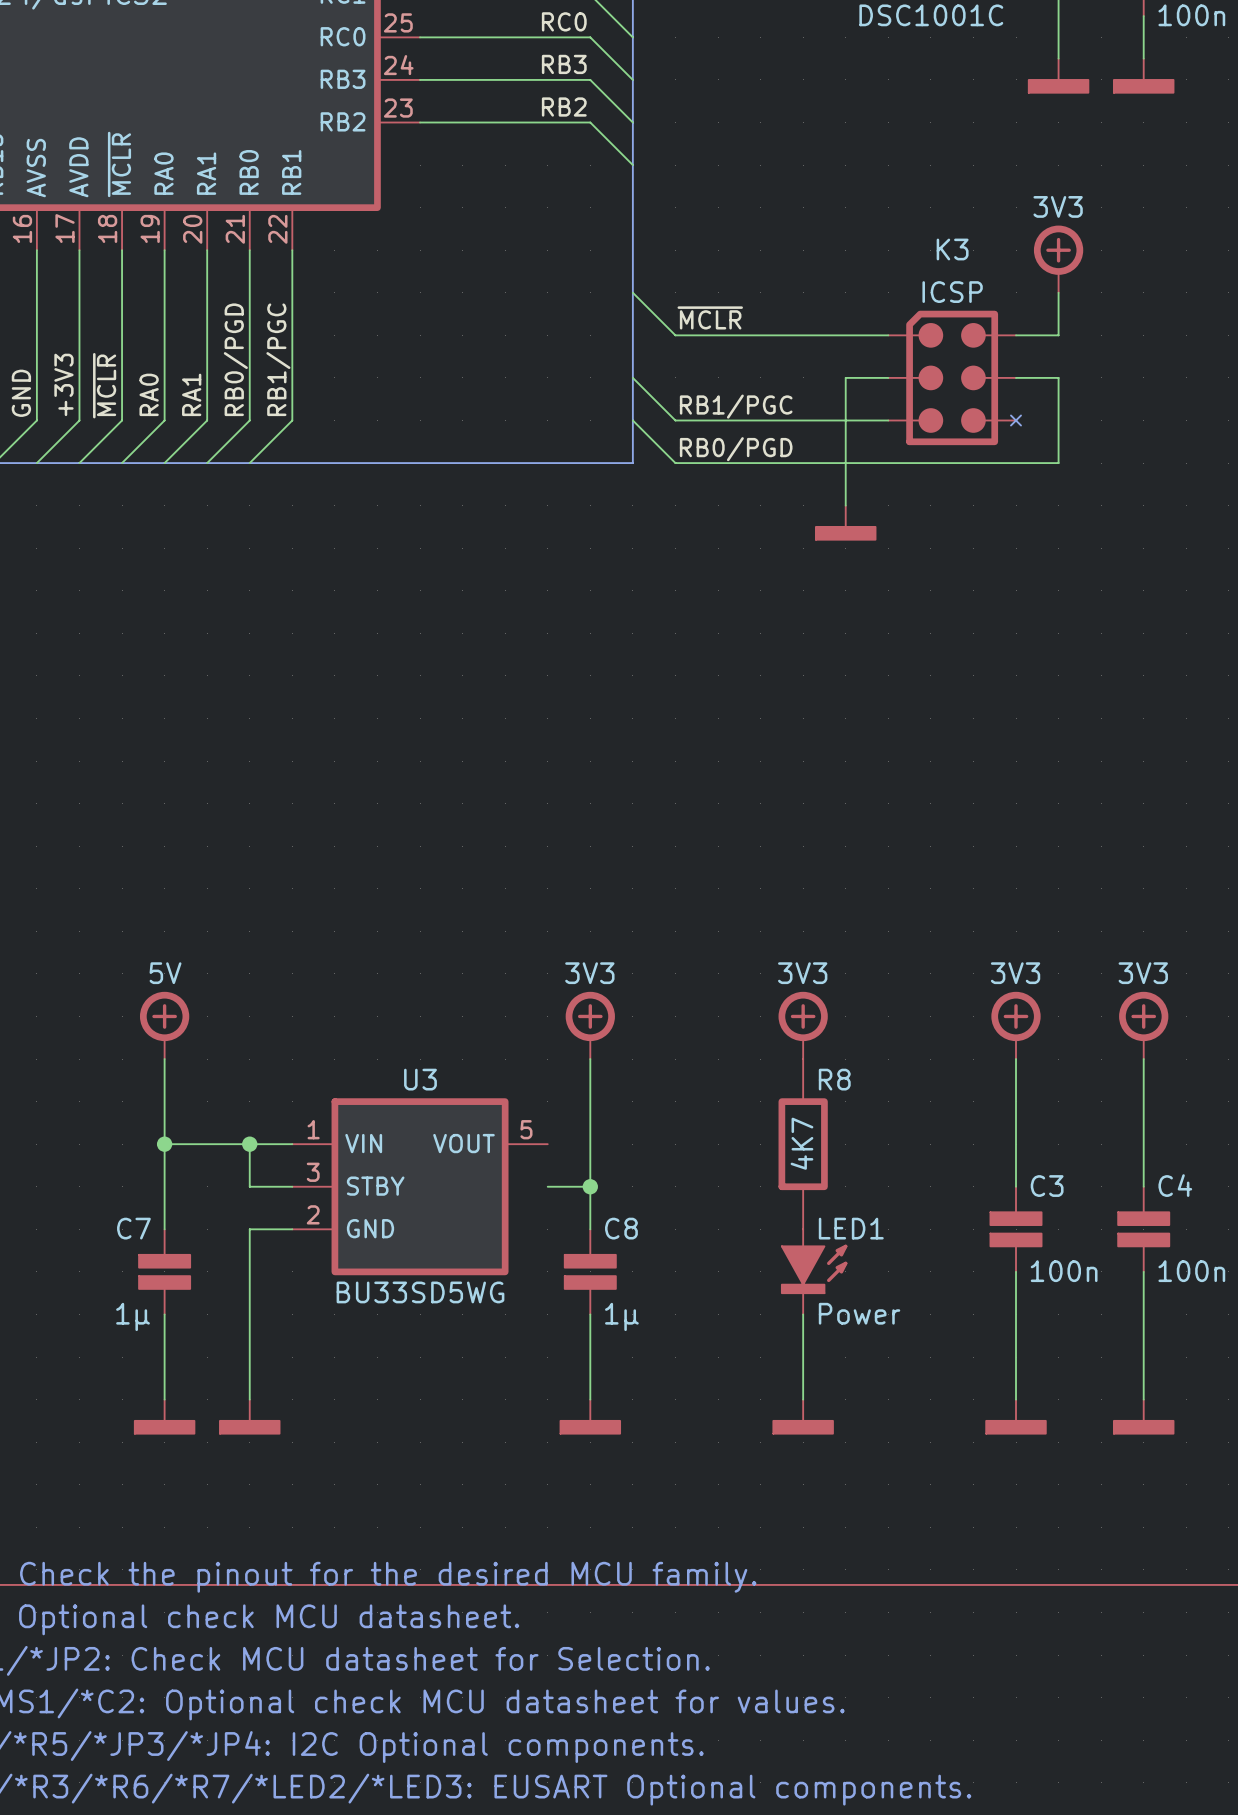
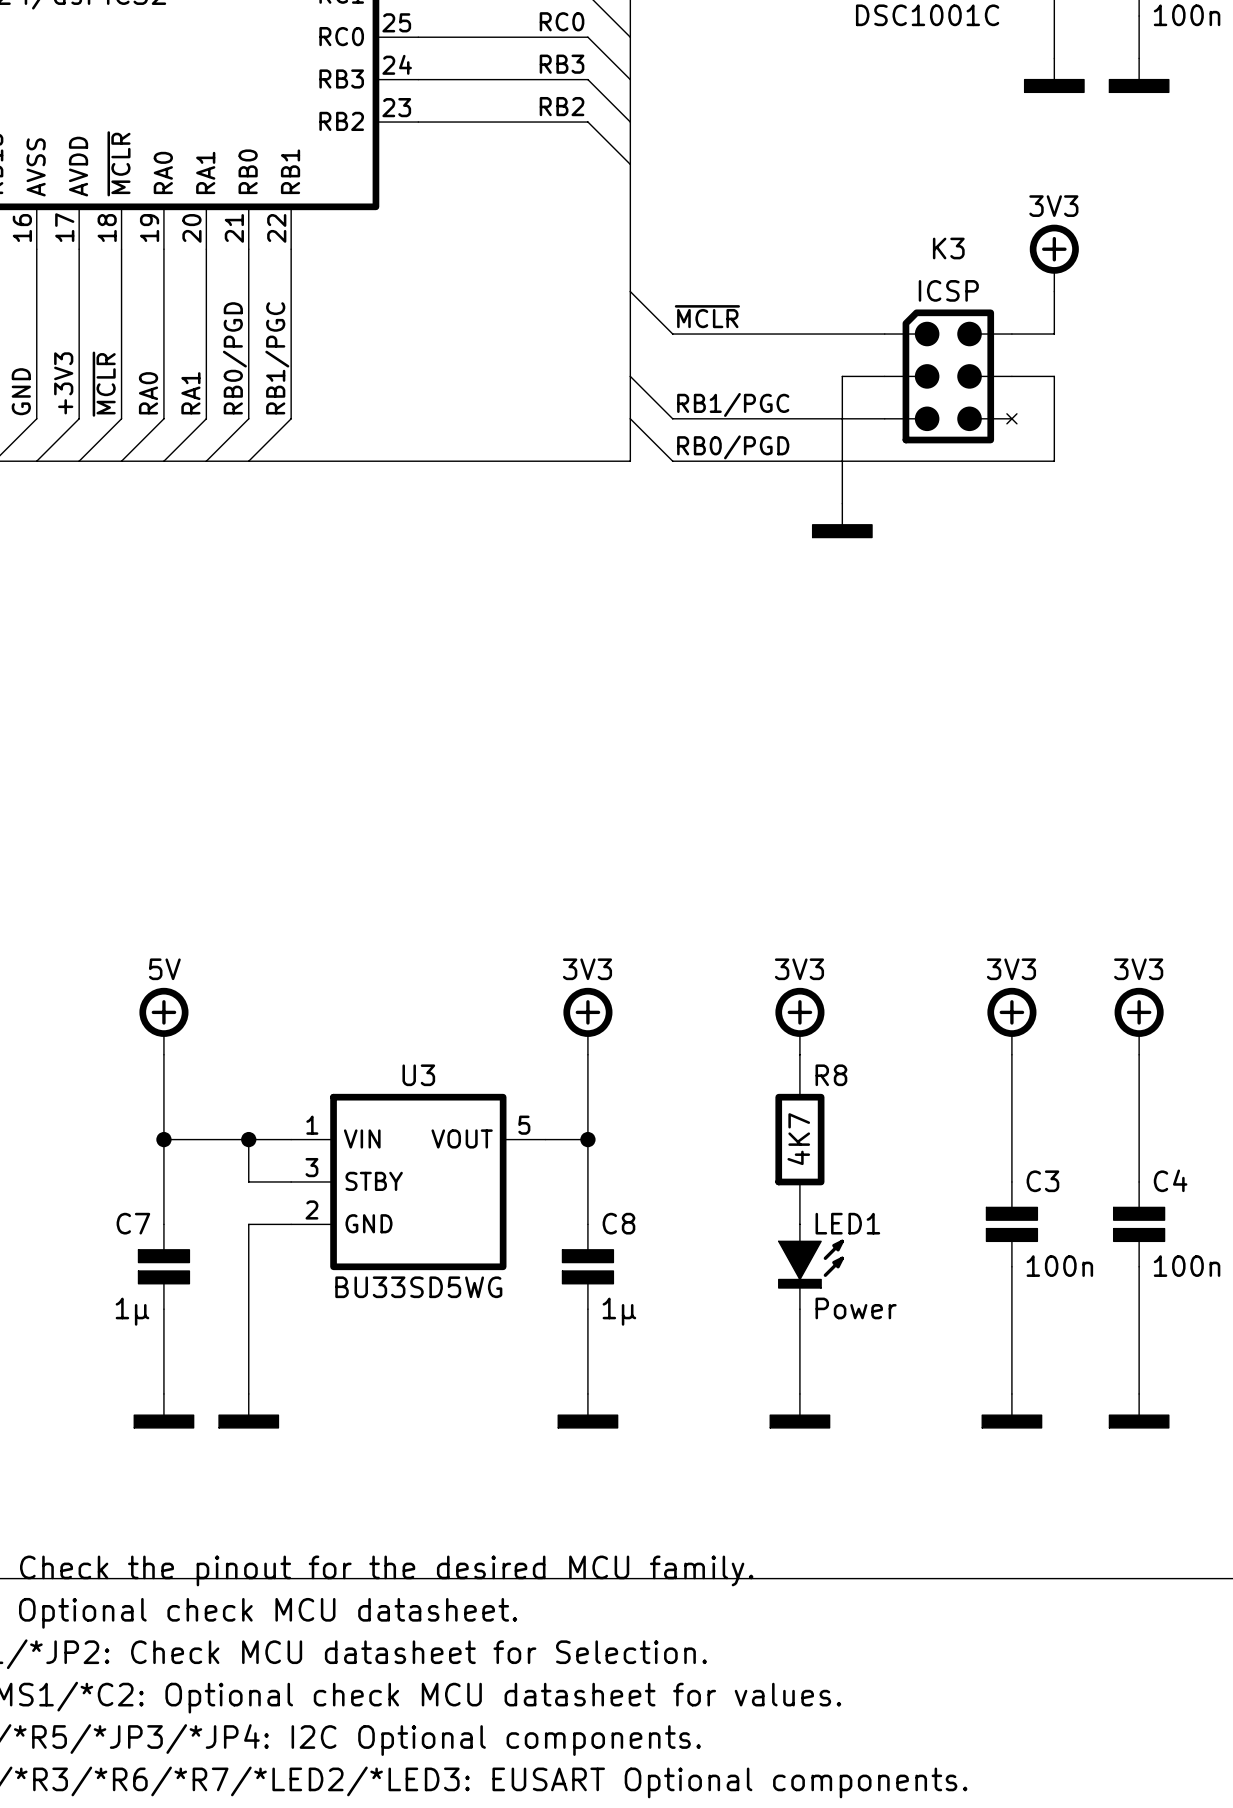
wire: (547, 1186) (590, 1186) -> (545, 1139) (587, 1139)
junction position: (590, 1186) -> (587, 1139)

